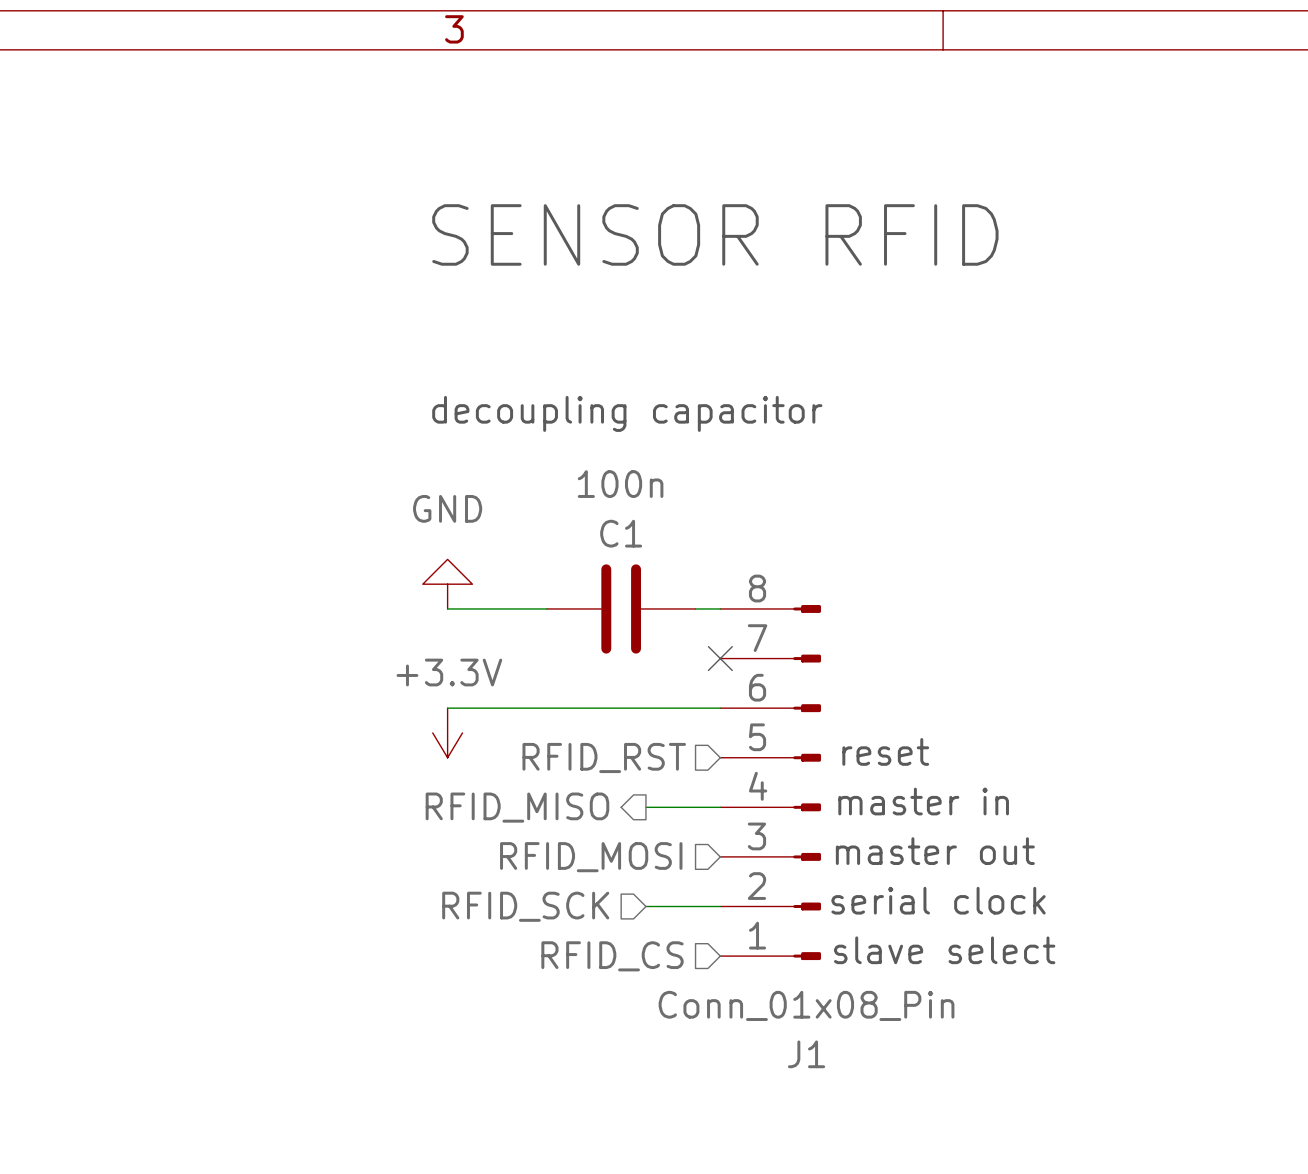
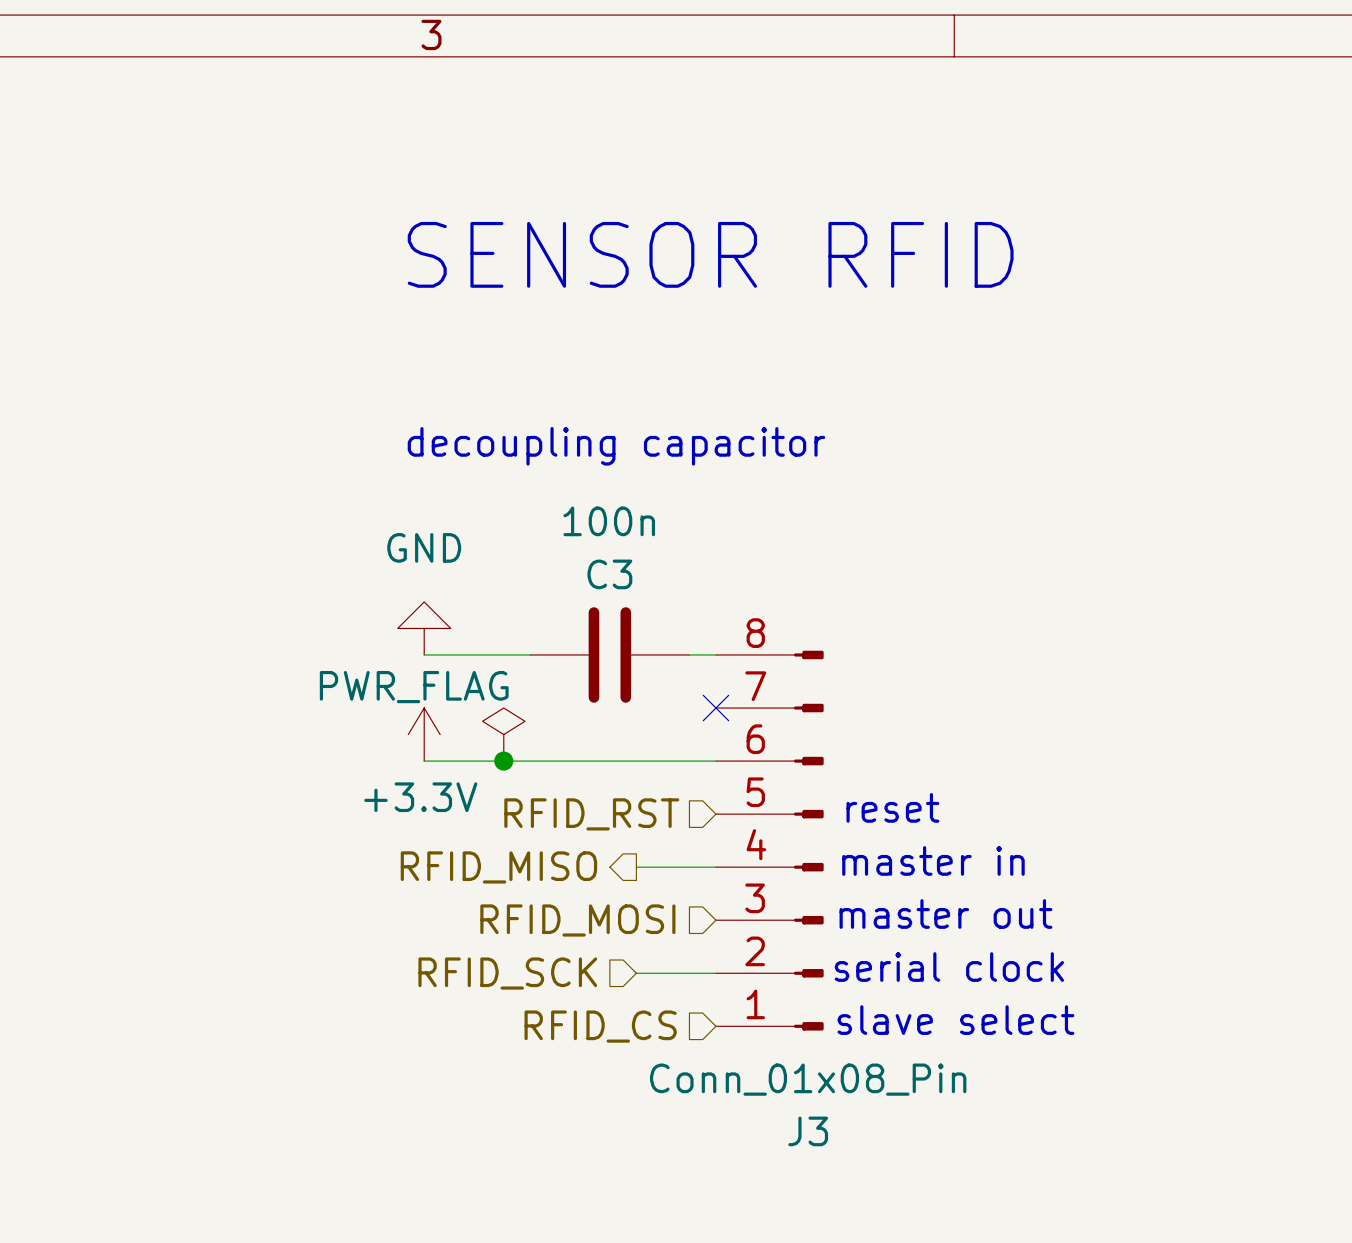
C1 name: C1 (621, 533) -> C3 (609, 574)
power symbol: none -> PWR_FLAG (503, 734)
junction: none -> (503, 761)
power symbol rotation: 0° (447, 732) -> 180° (424, 734)
power symbol position: +3.3V (447, 732) -> +3.3V (424, 734)
J1 name: J1 (806, 1054) -> J3 (808, 1131)

